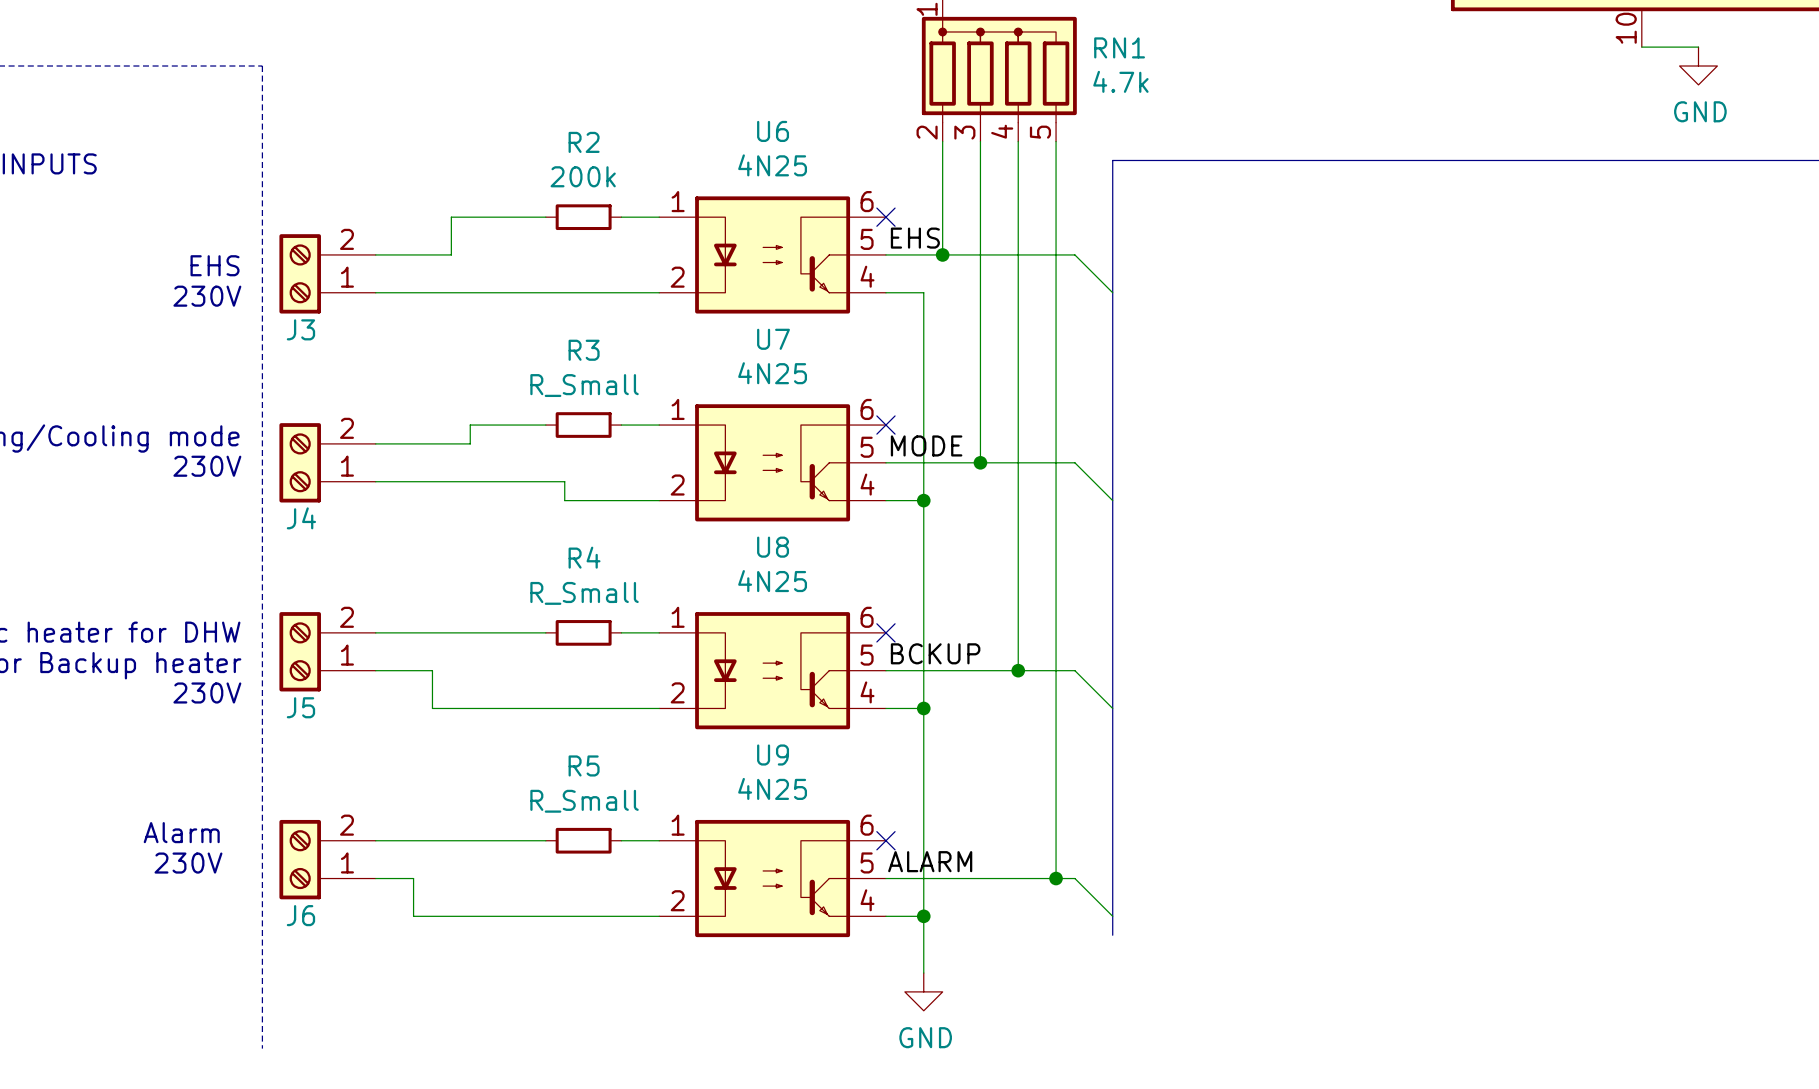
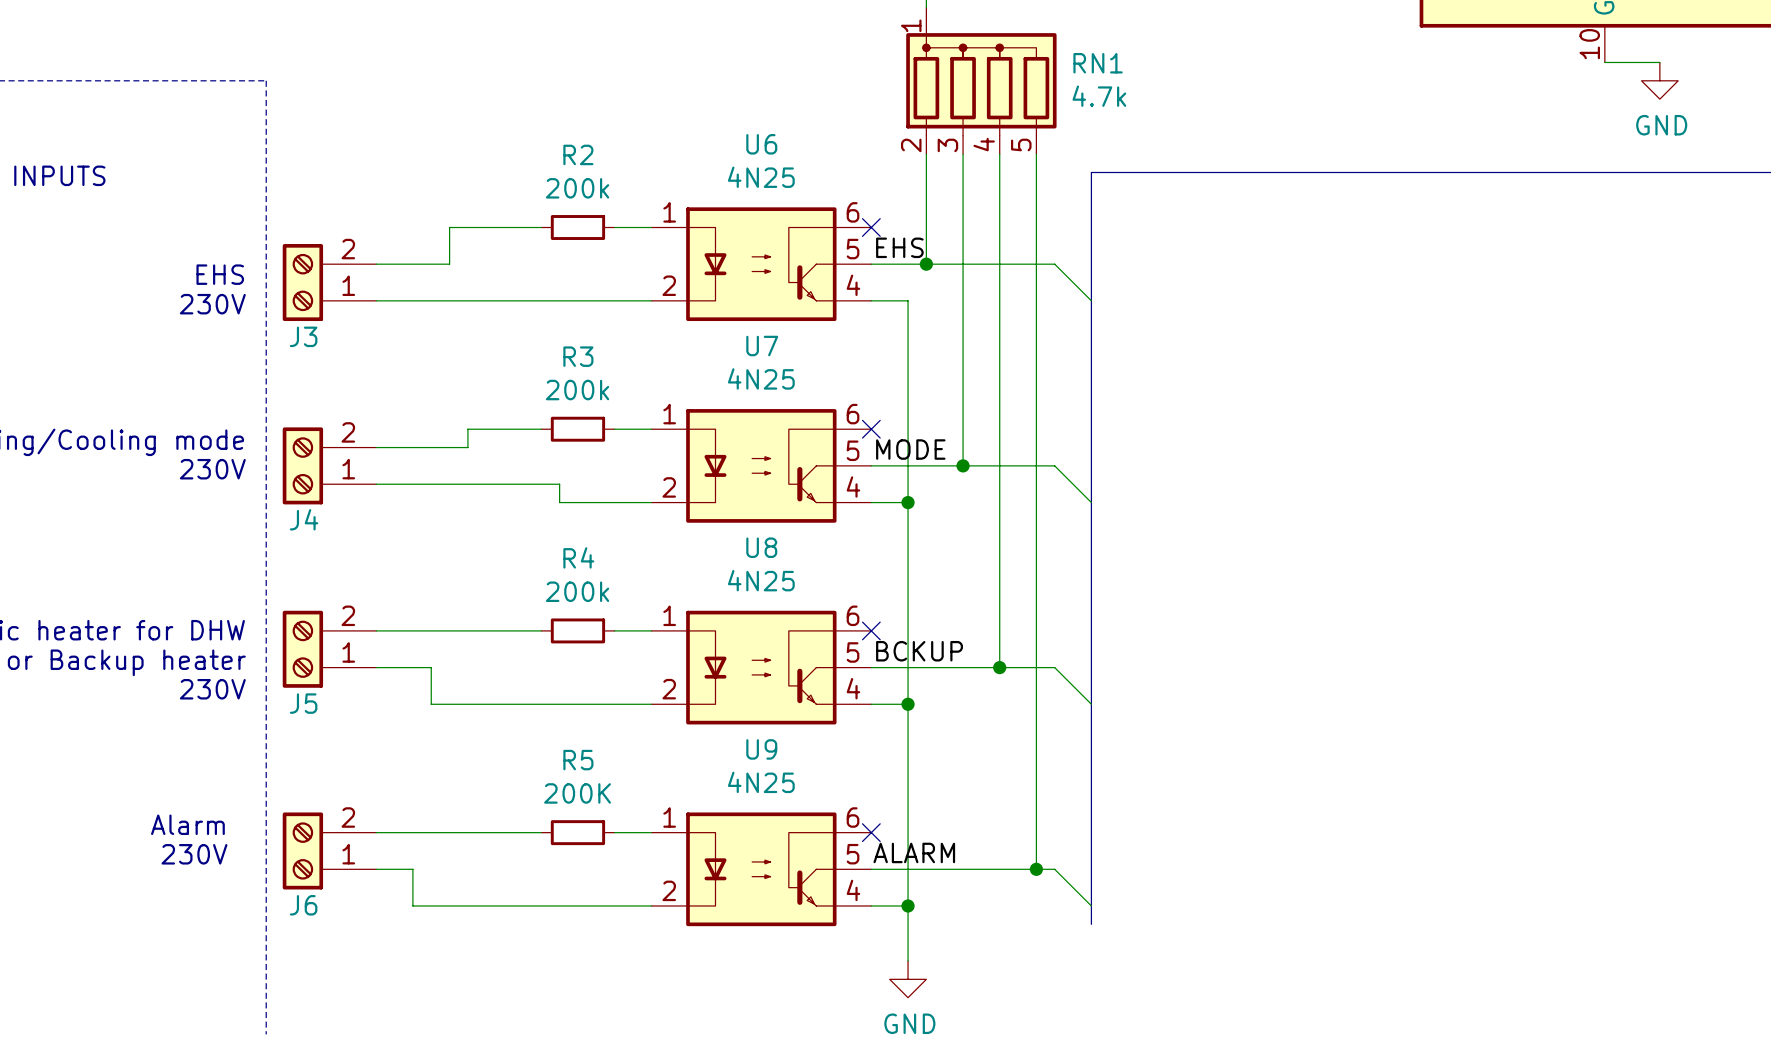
R3 value: R_Small (584, 385) -> 200k (577, 390)
R4 value: R_Small (584, 593) -> 200k (577, 591)
R5 value: R_Small (584, 801) -> 200K (577, 793)

